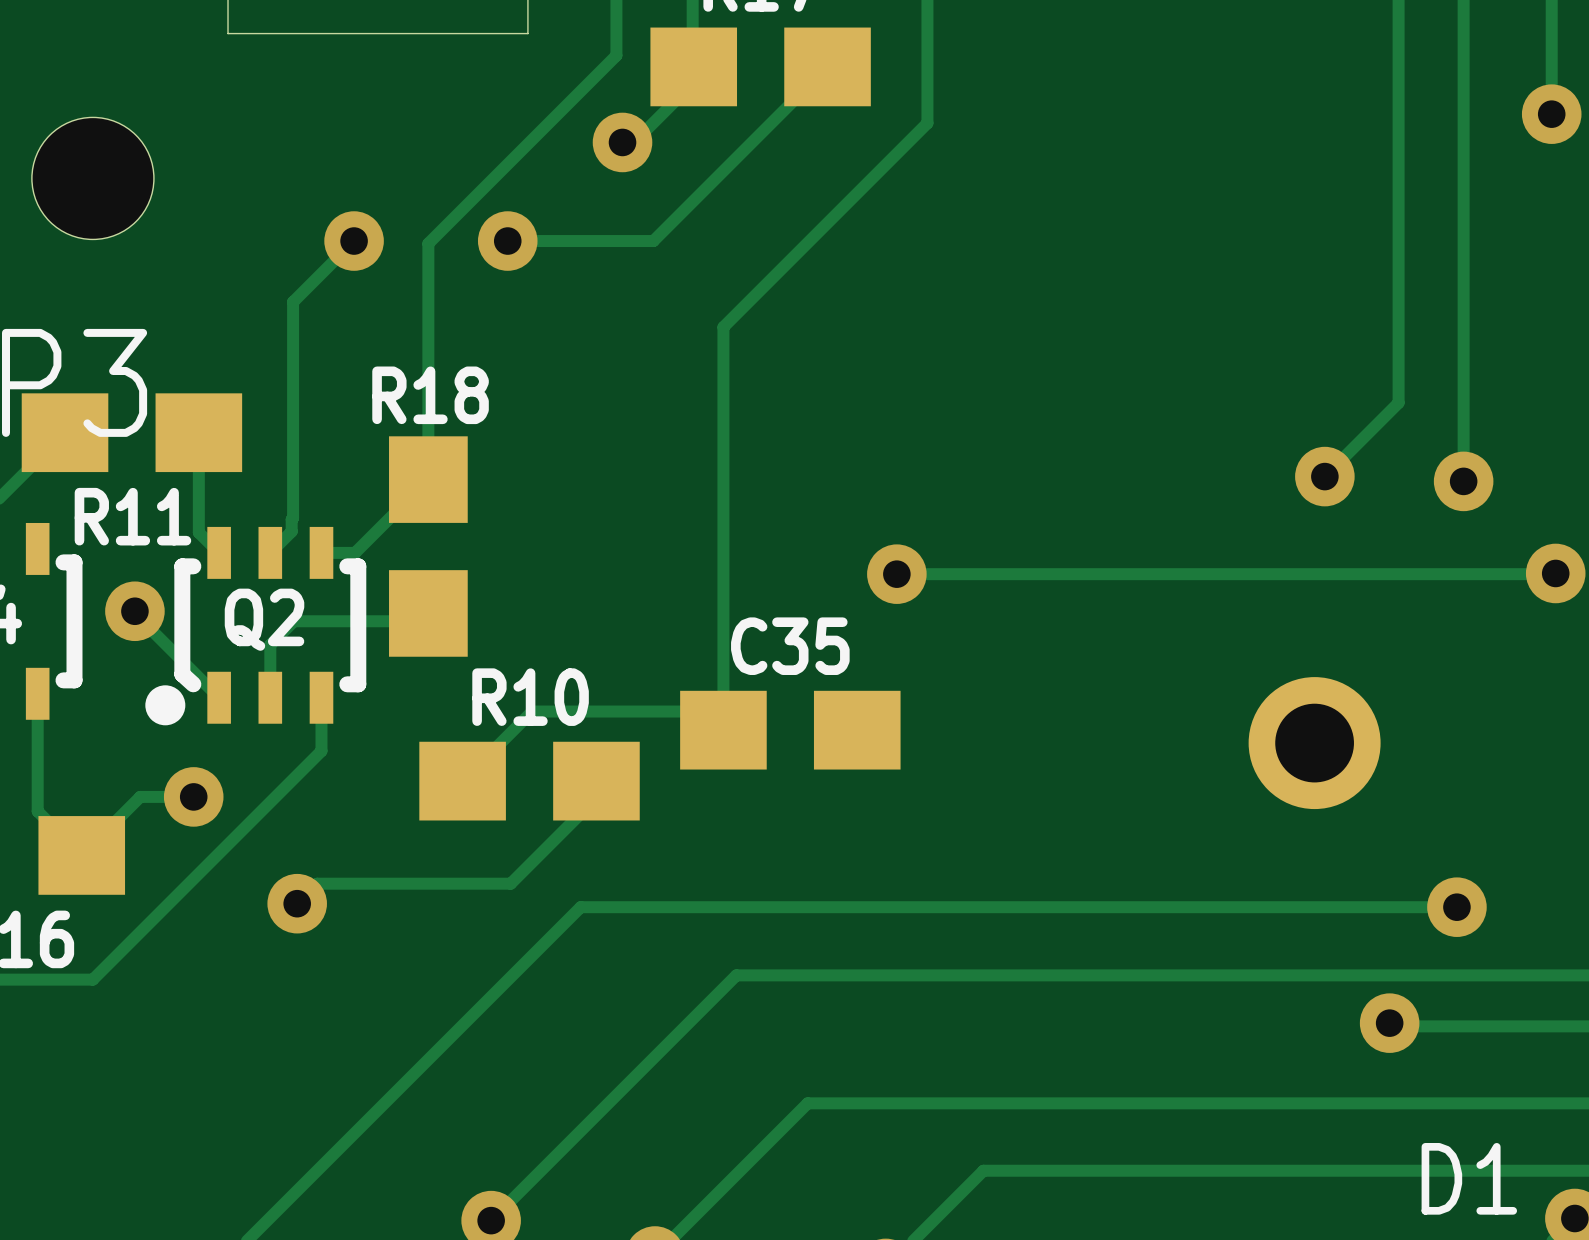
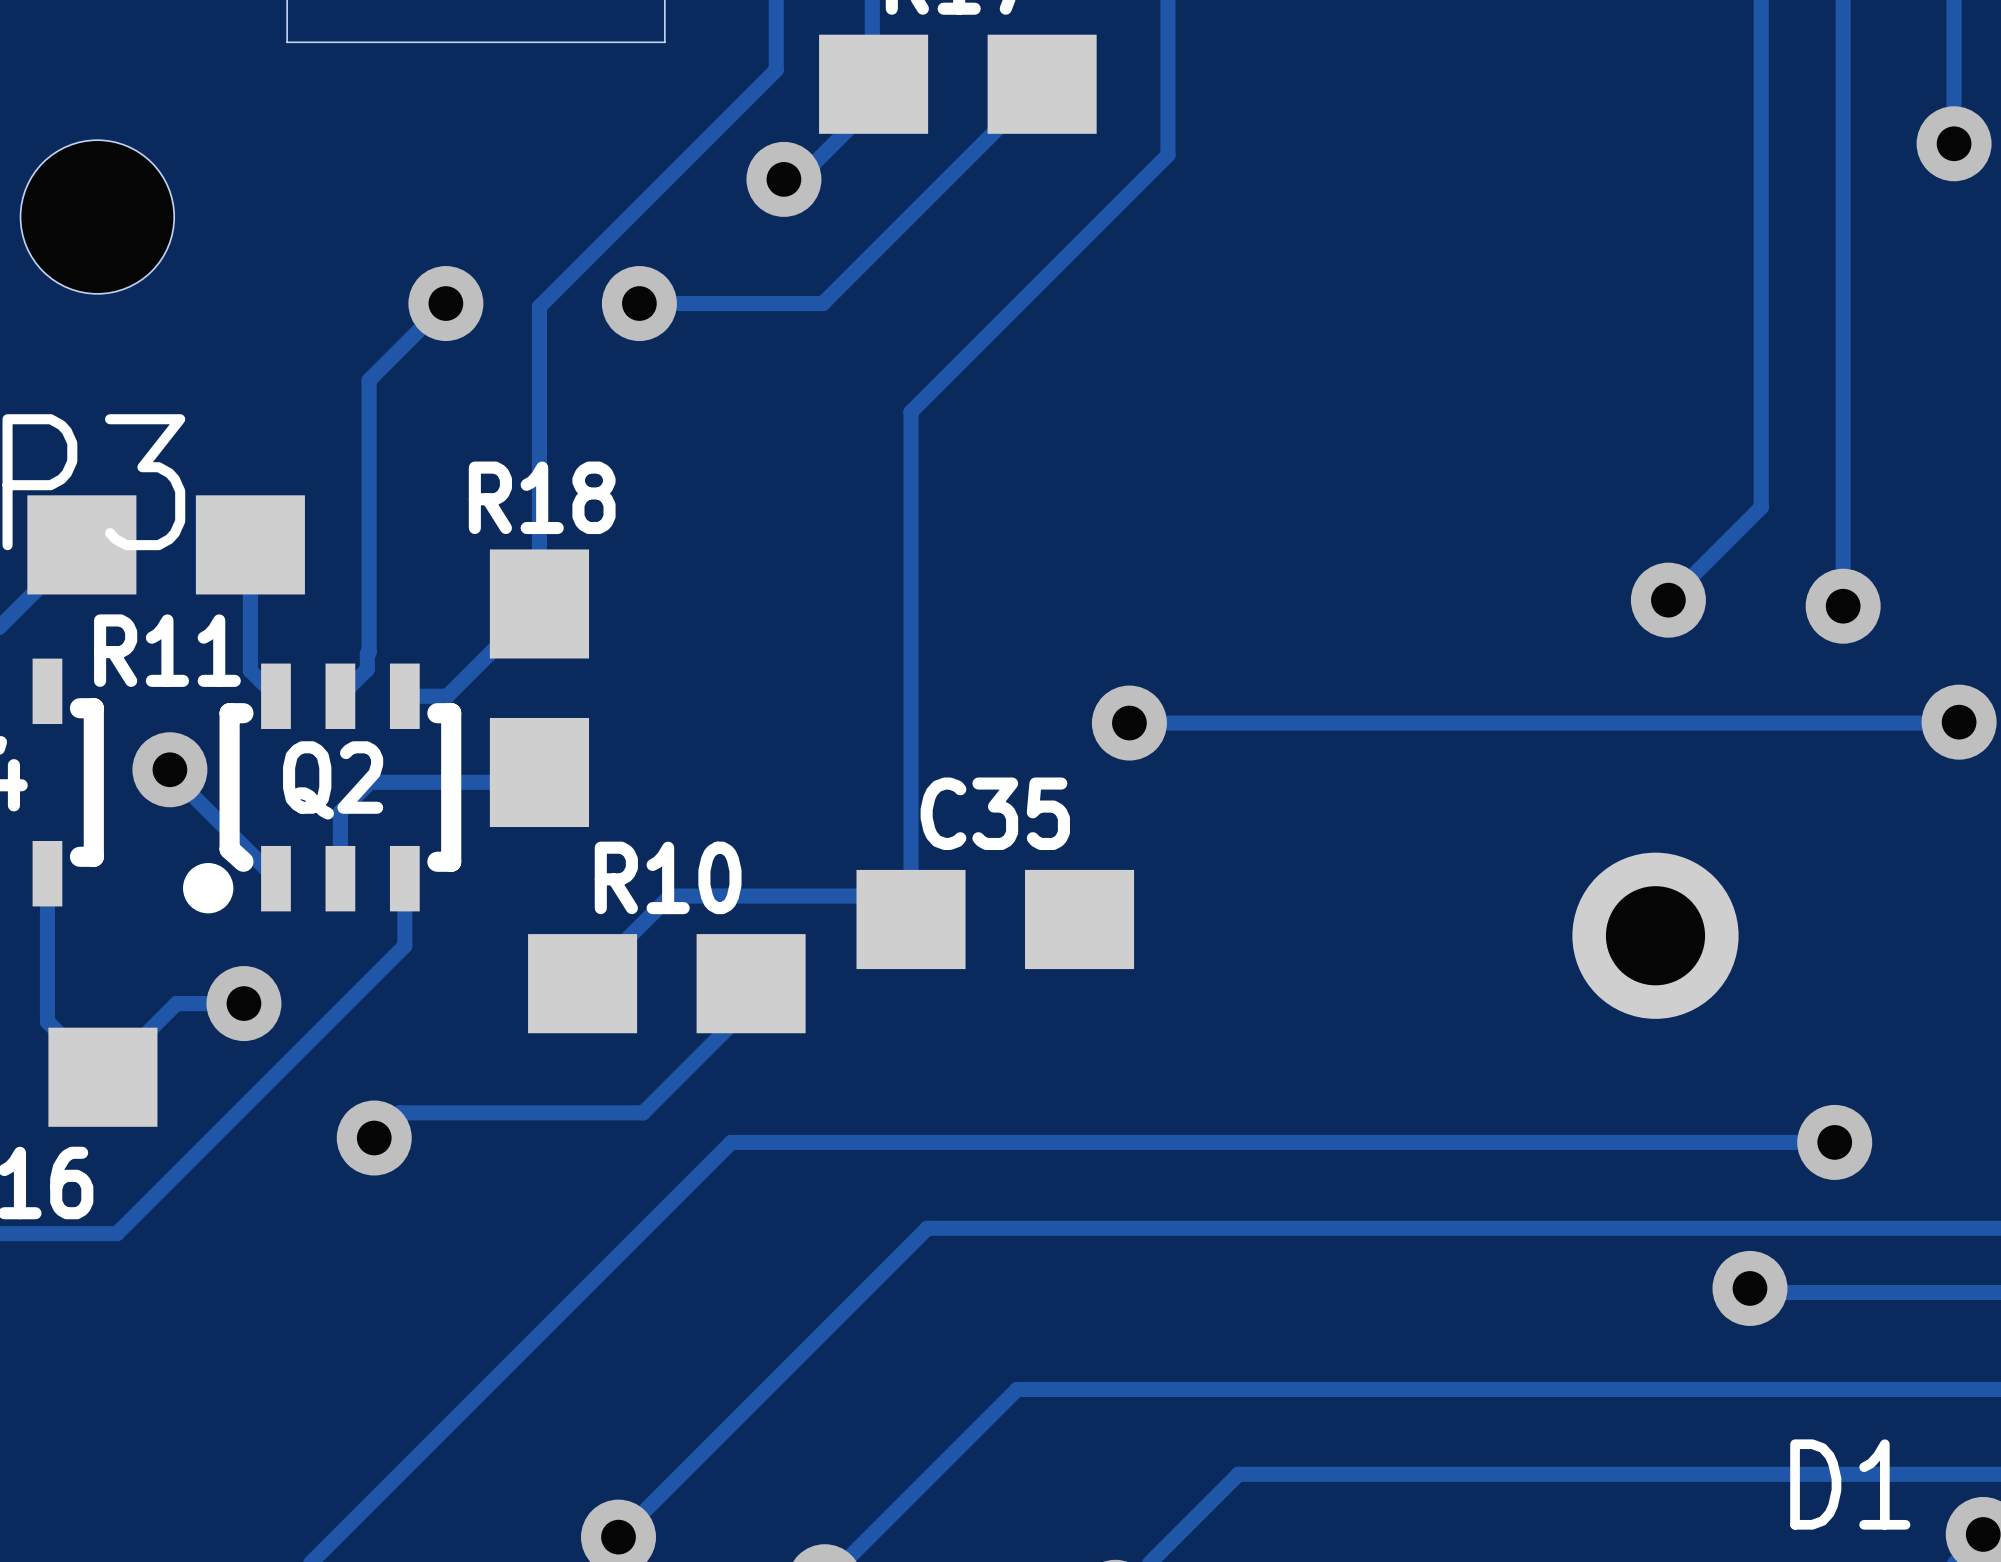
hole position: (92, 178) -> (97, 217)

